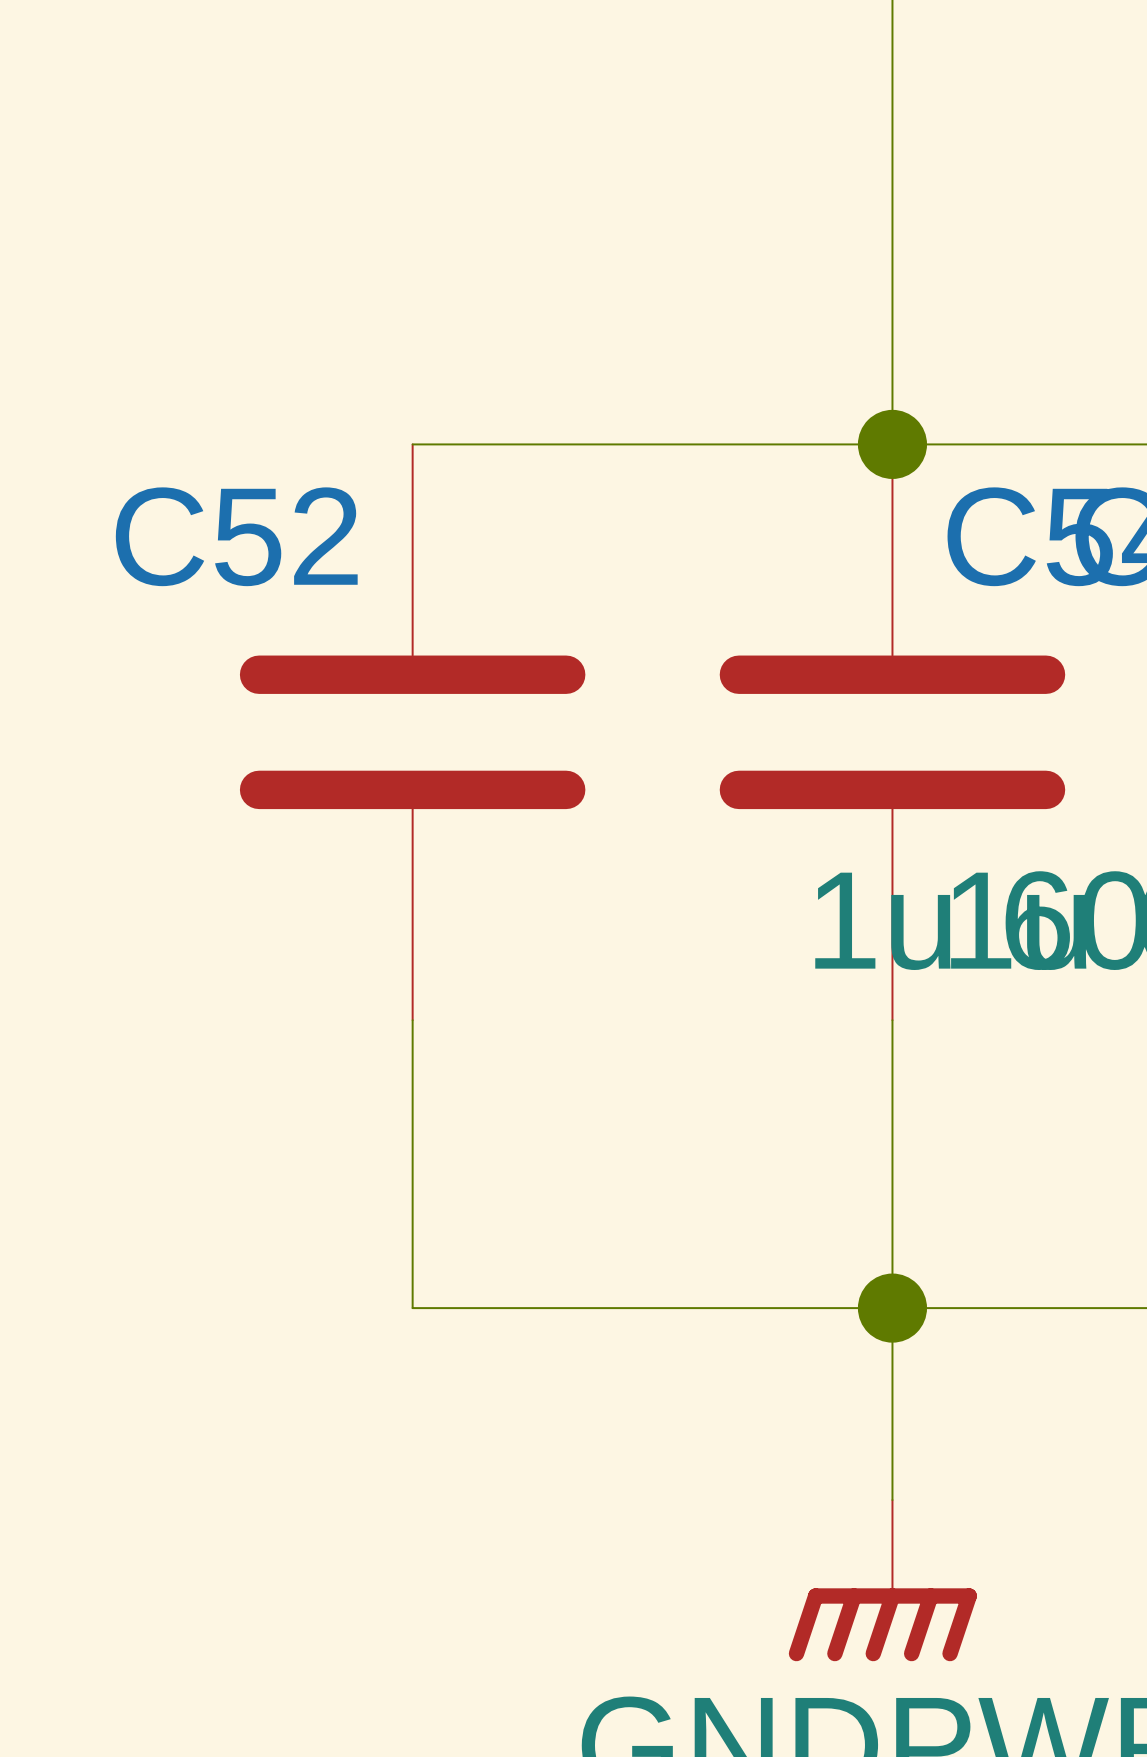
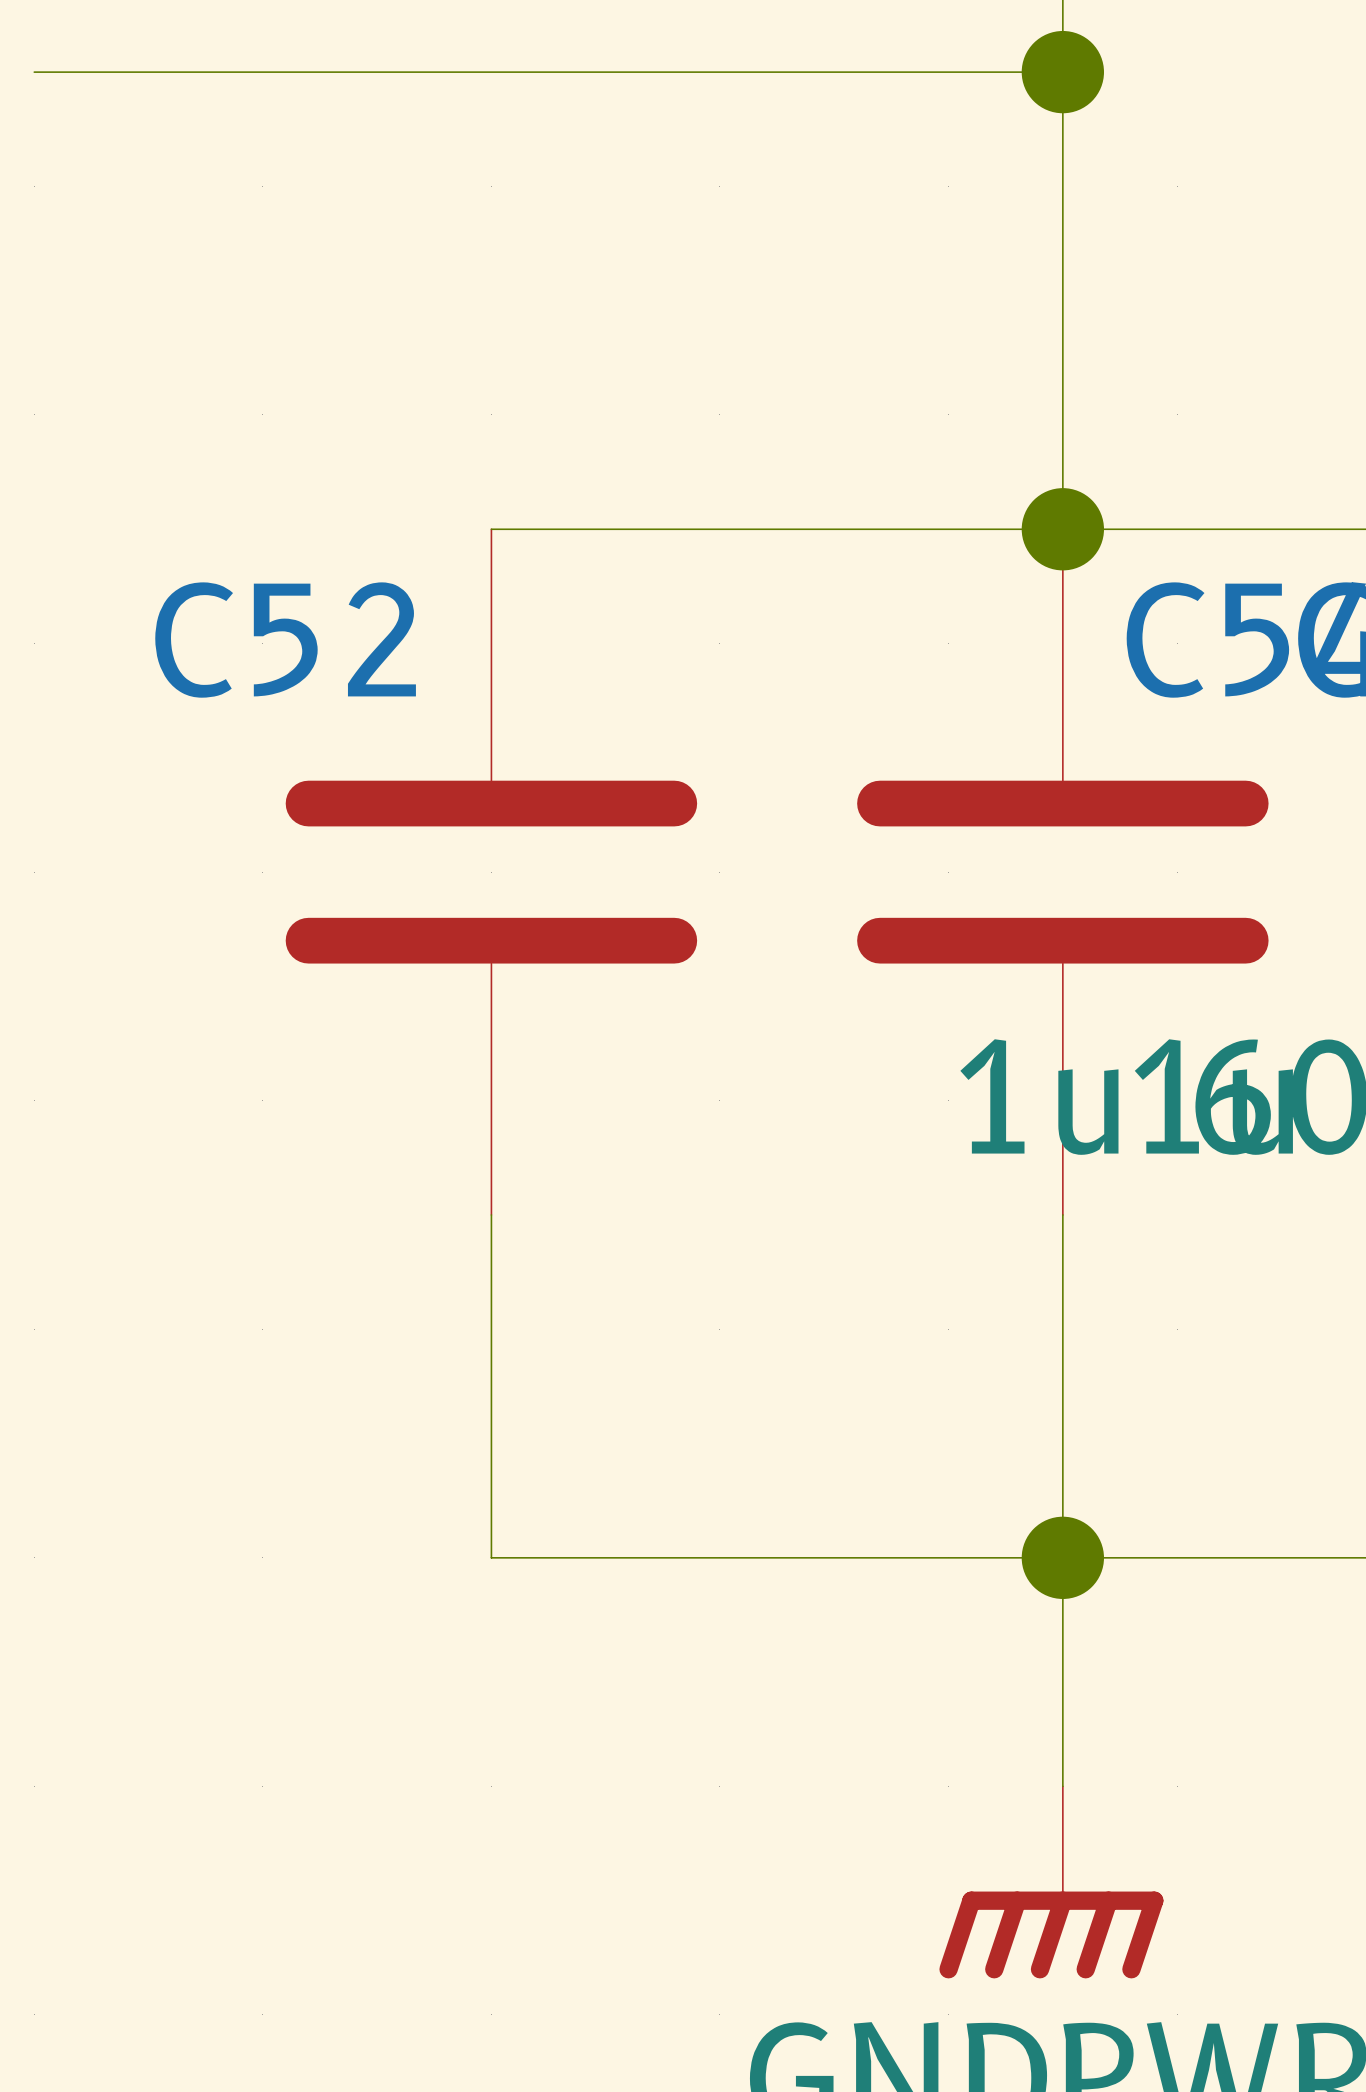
wire: none -> (34, 72) (1062, 72)
junction: none -> (1062, 72)

